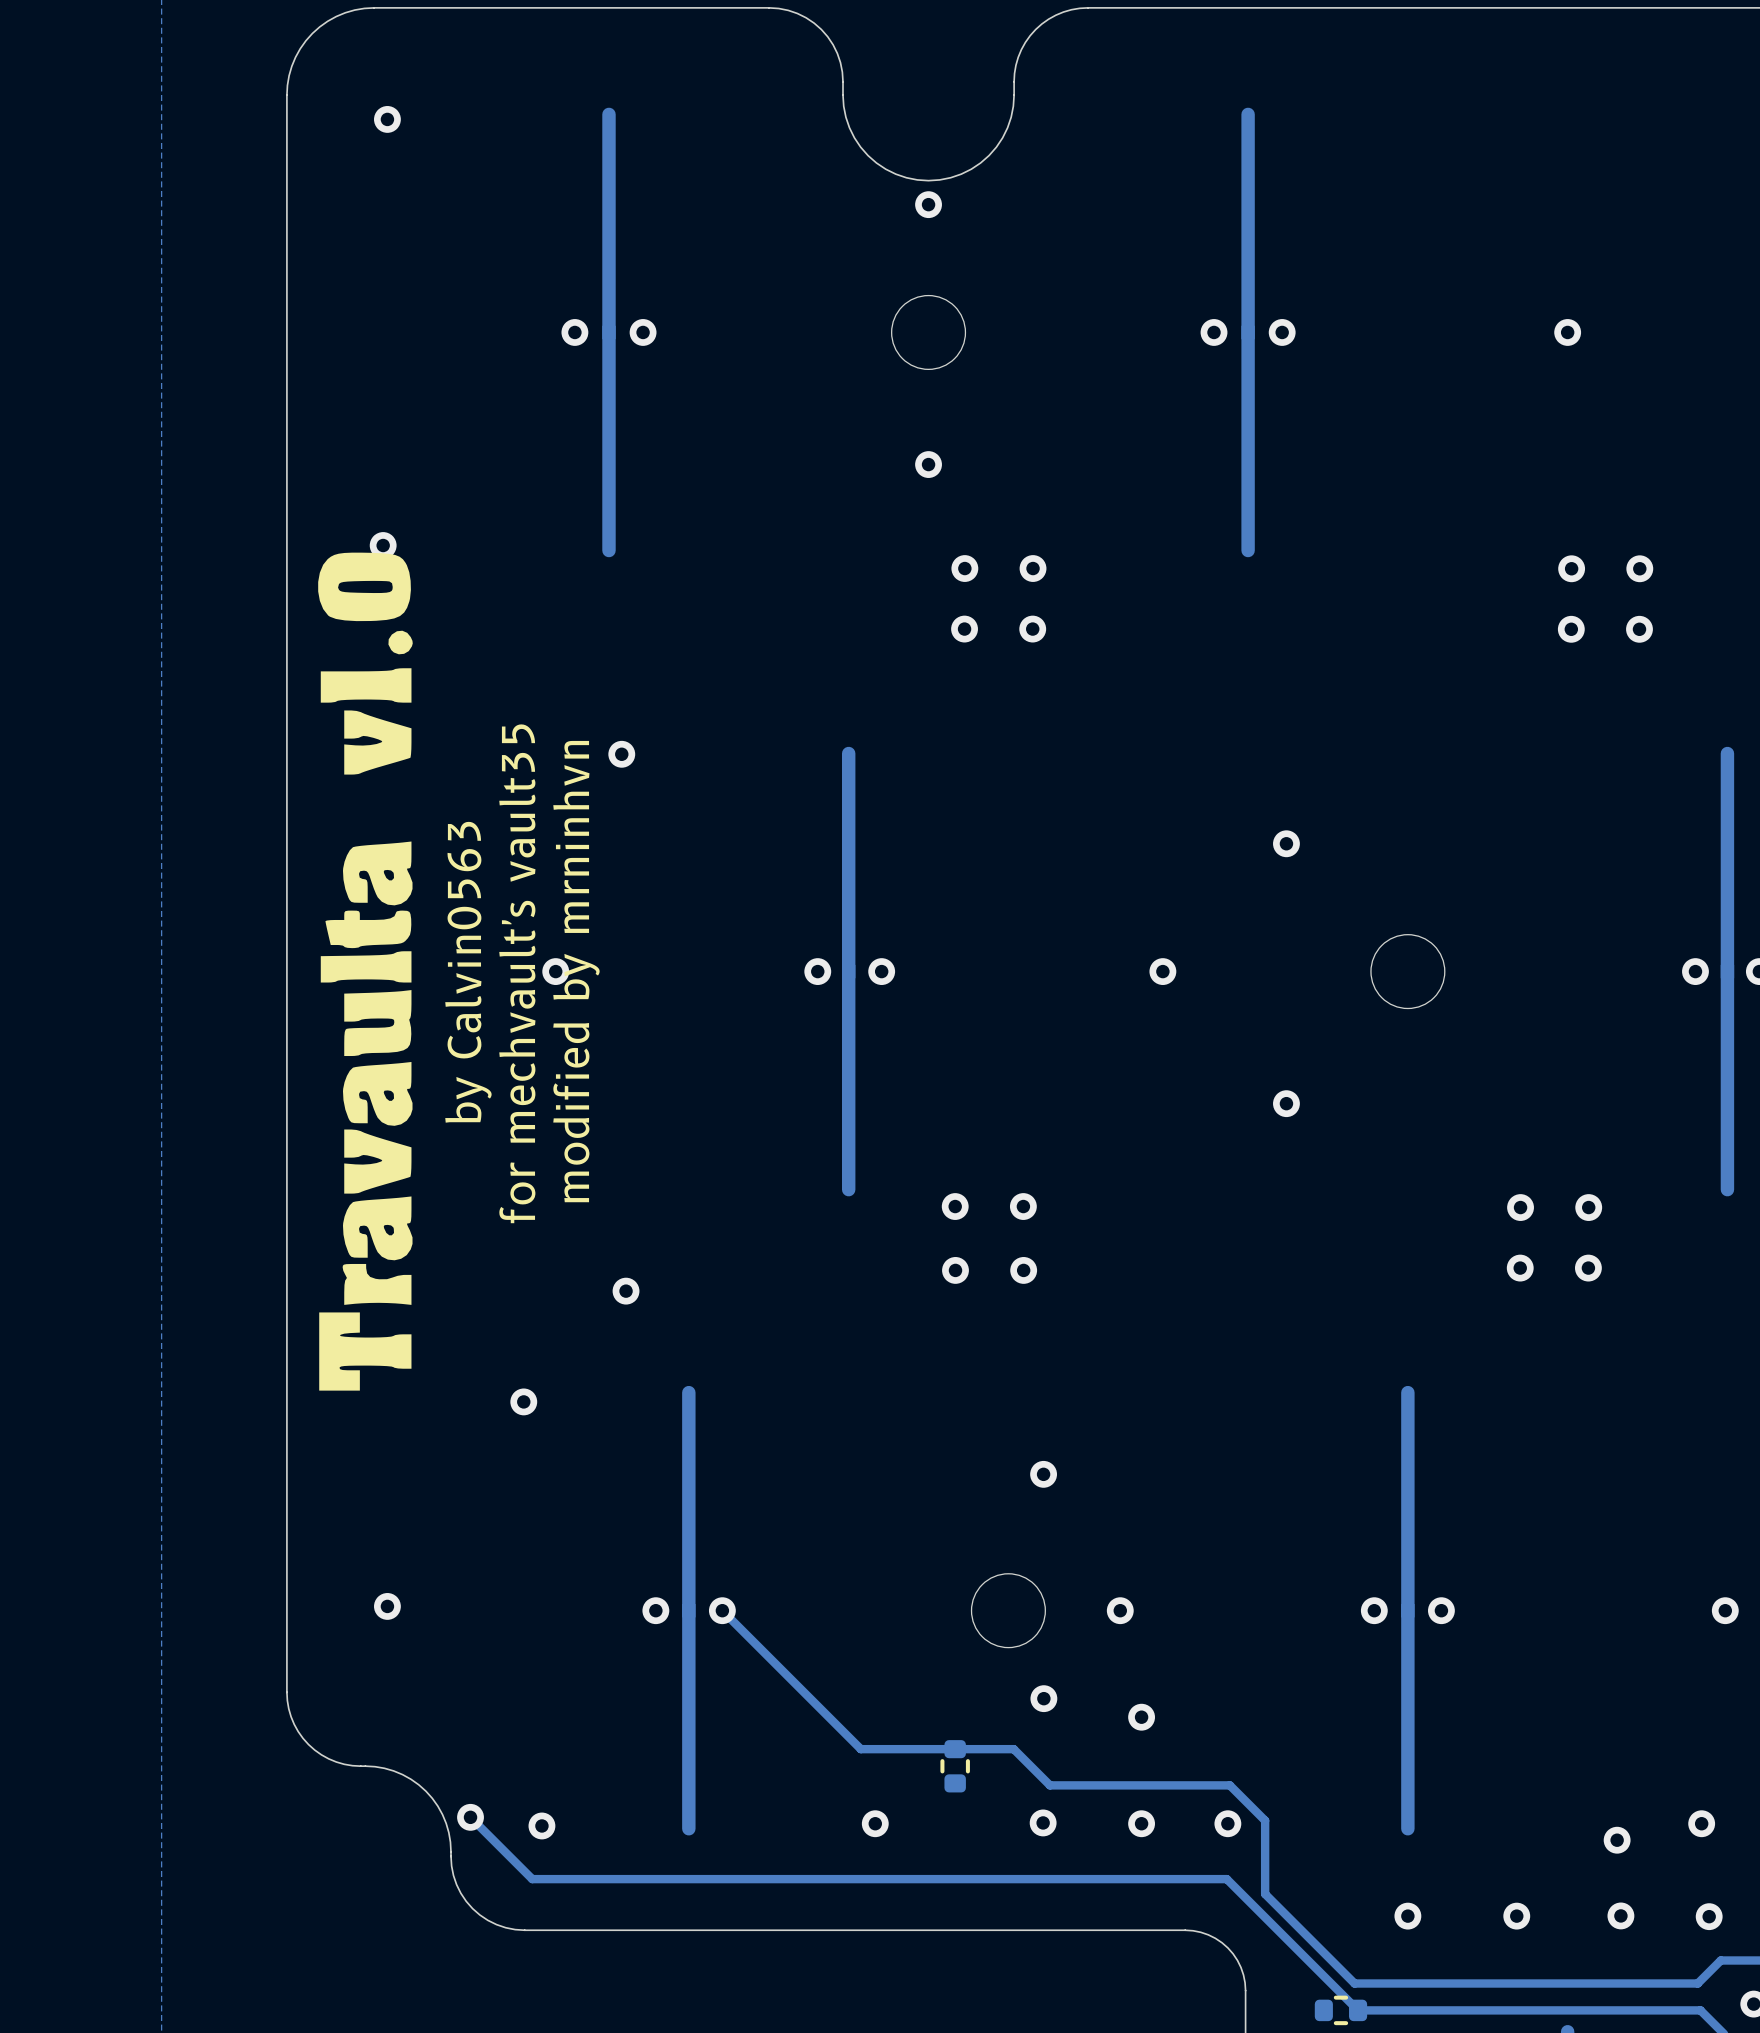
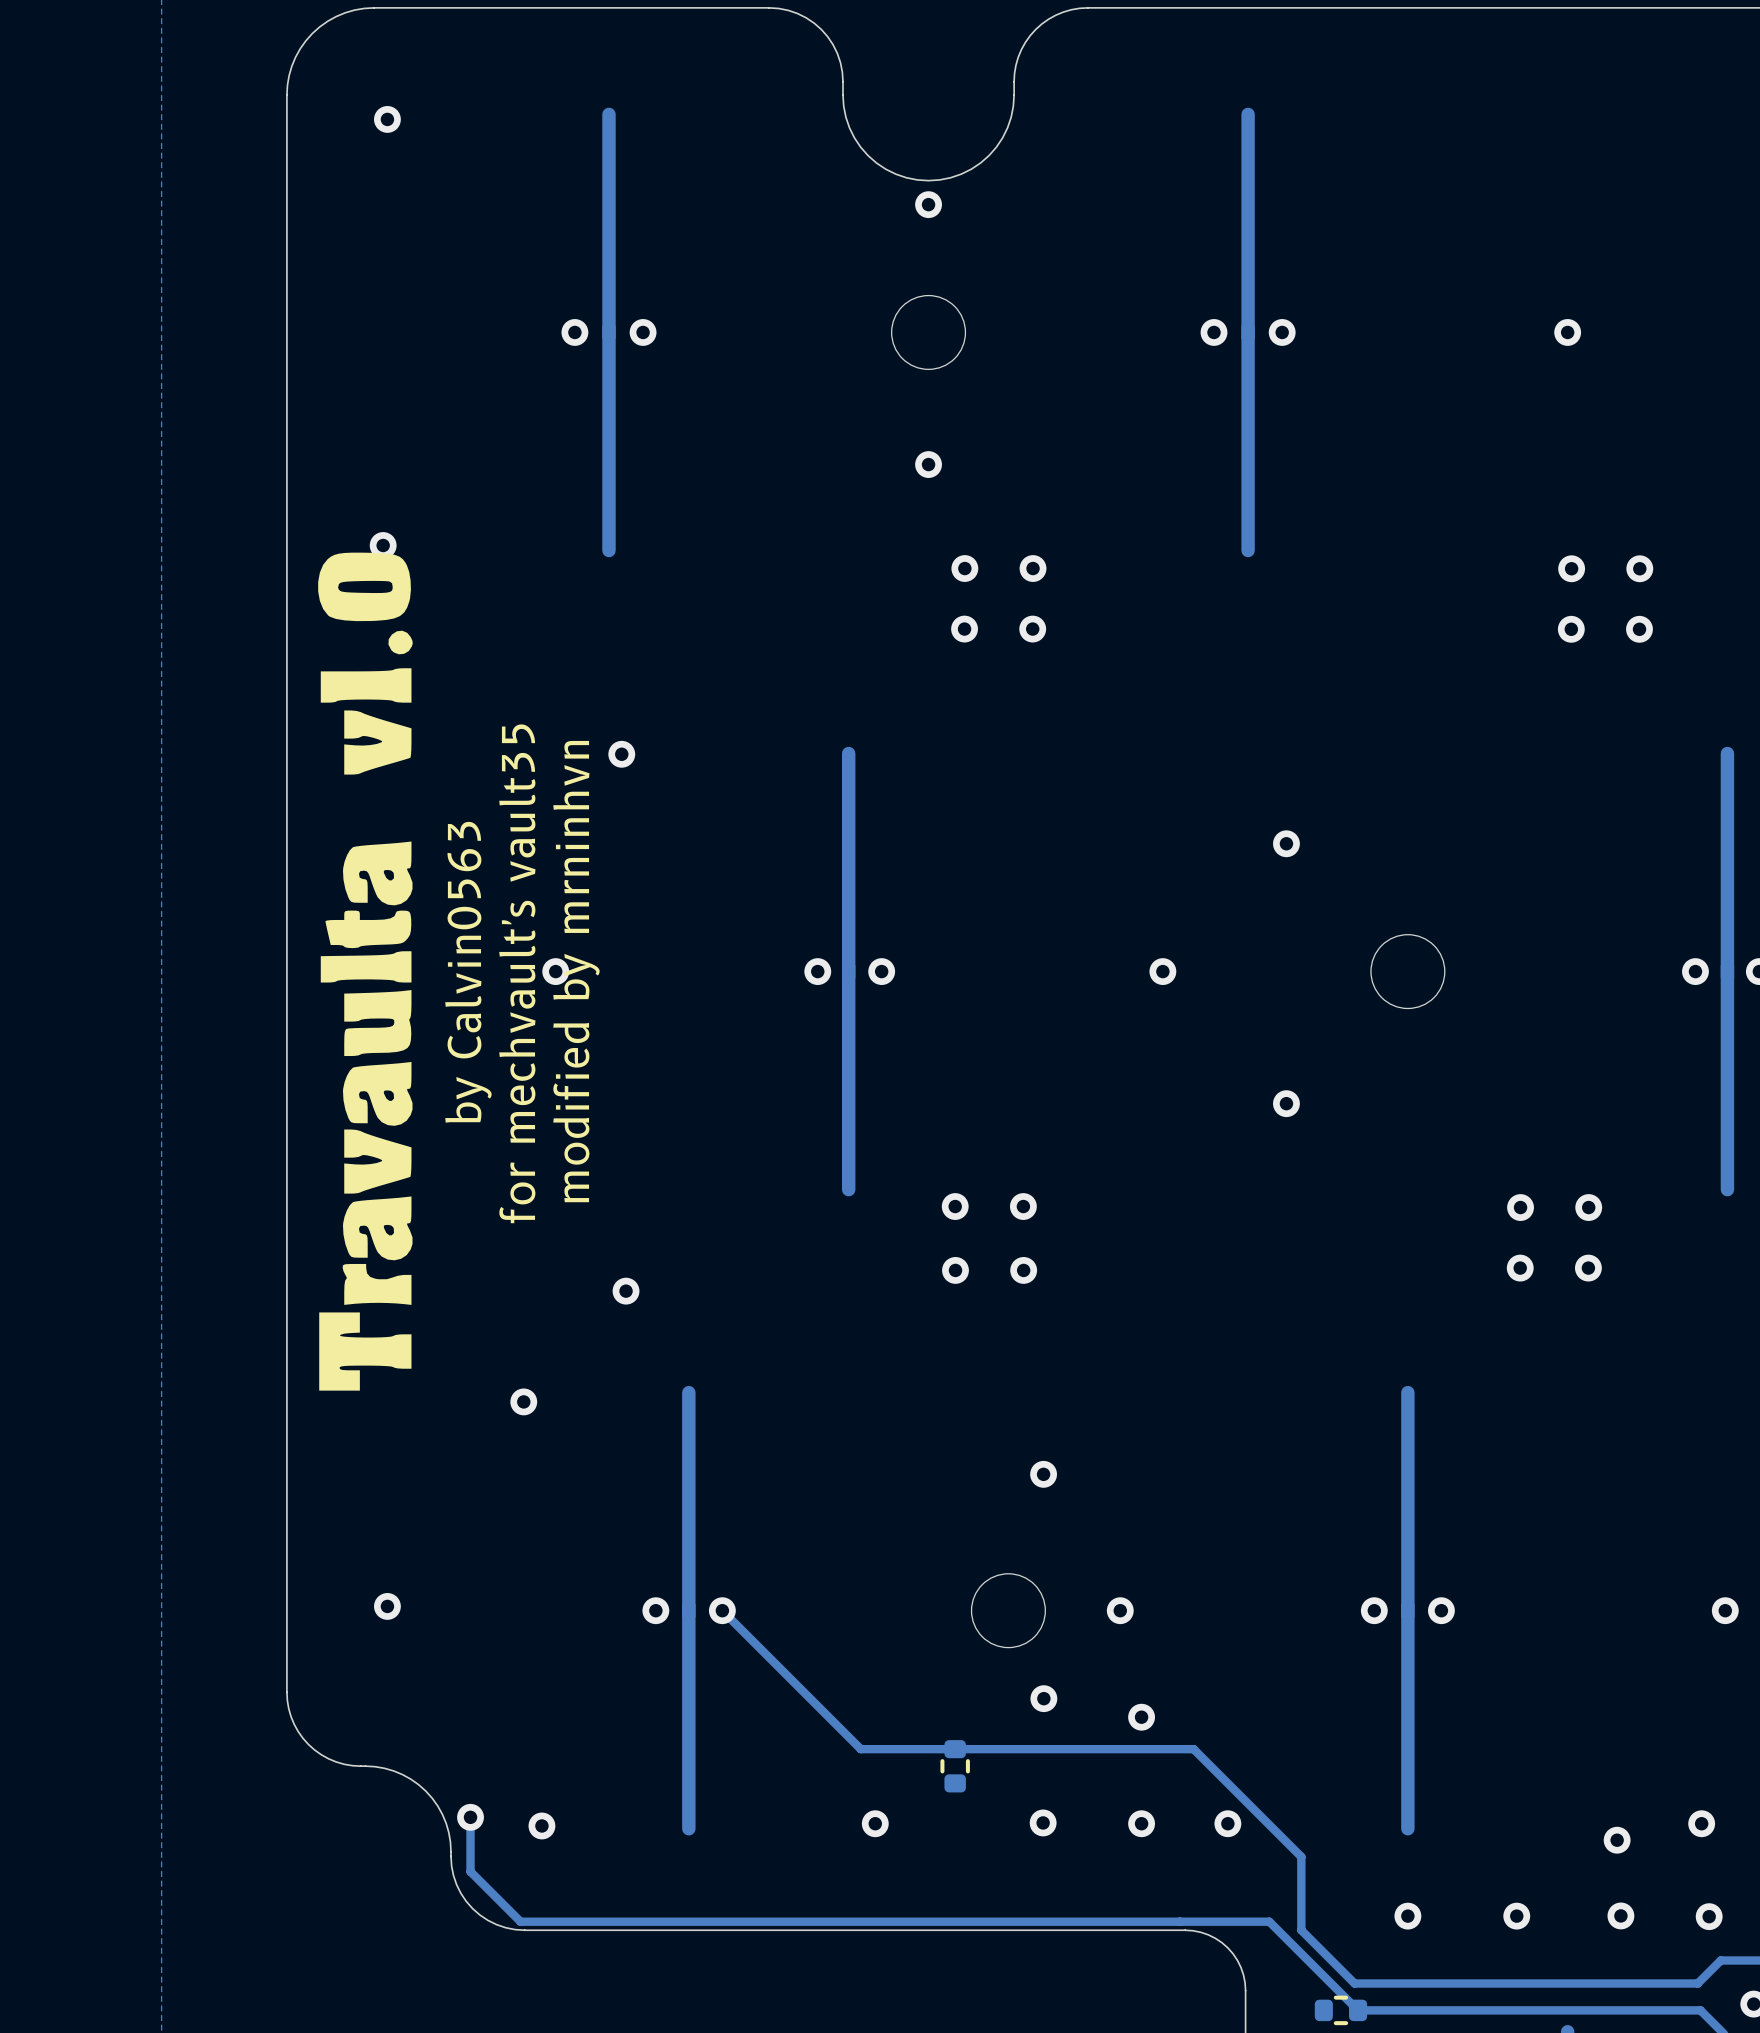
track: (1013, 1749) (1049, 1785) (1229, 1785) -> (1013, 1749) (1193, 1749) (1229, 1785)
track: (470, 1817) (532, 1879) (1226, 1879) (1269, 1921) -> (470, 1817) (470, 1871) (520, 1921) (1269, 1921)
track: (1265, 1820) (1265, 1894) (1301, 1930) -> (1265, 1820) (1301, 1856) (1301, 1930)

